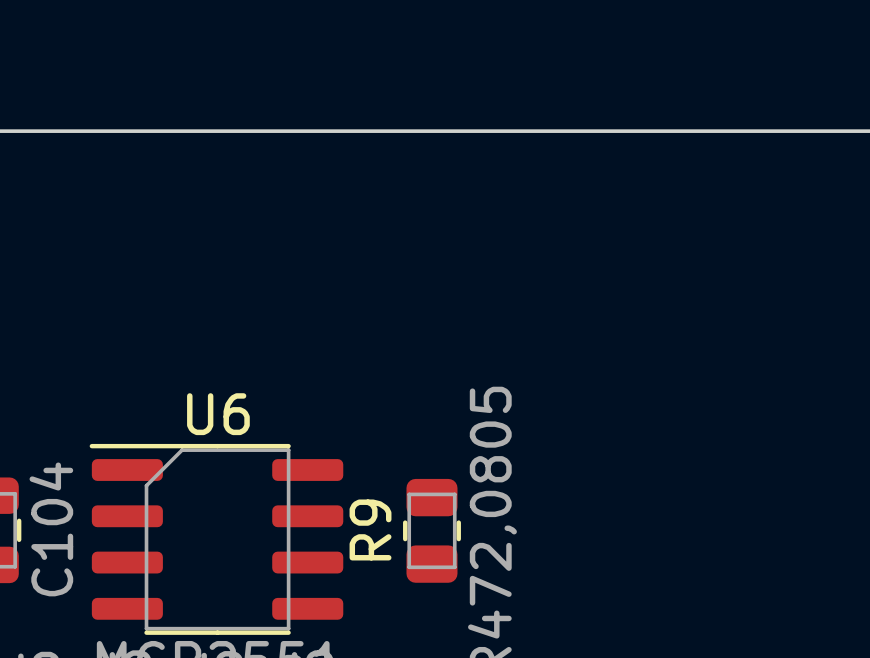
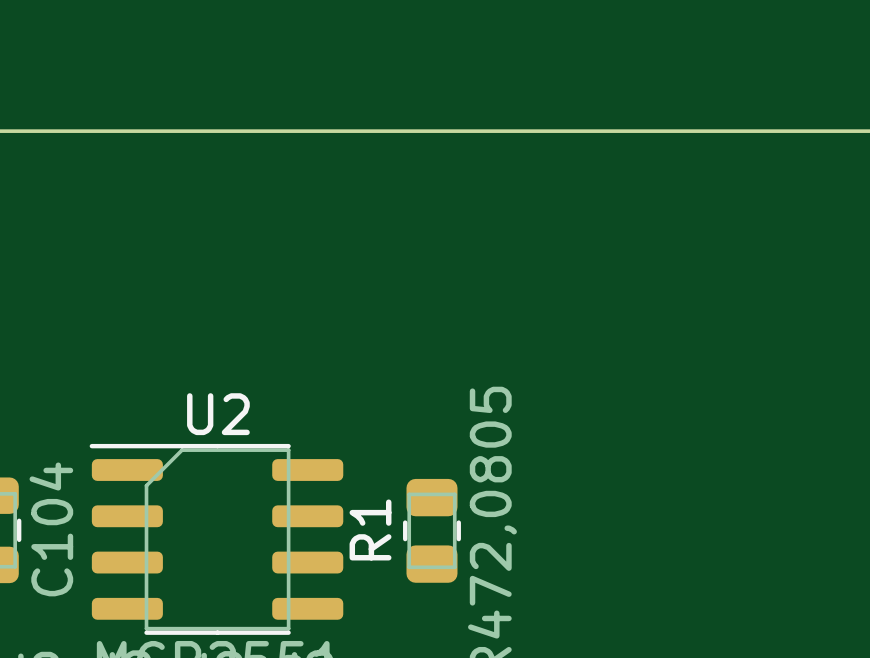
U6 name: U6 (218, 414) -> U2 (218, 414)
R9 name: R9 (370, 529) -> R1 (370, 529)

